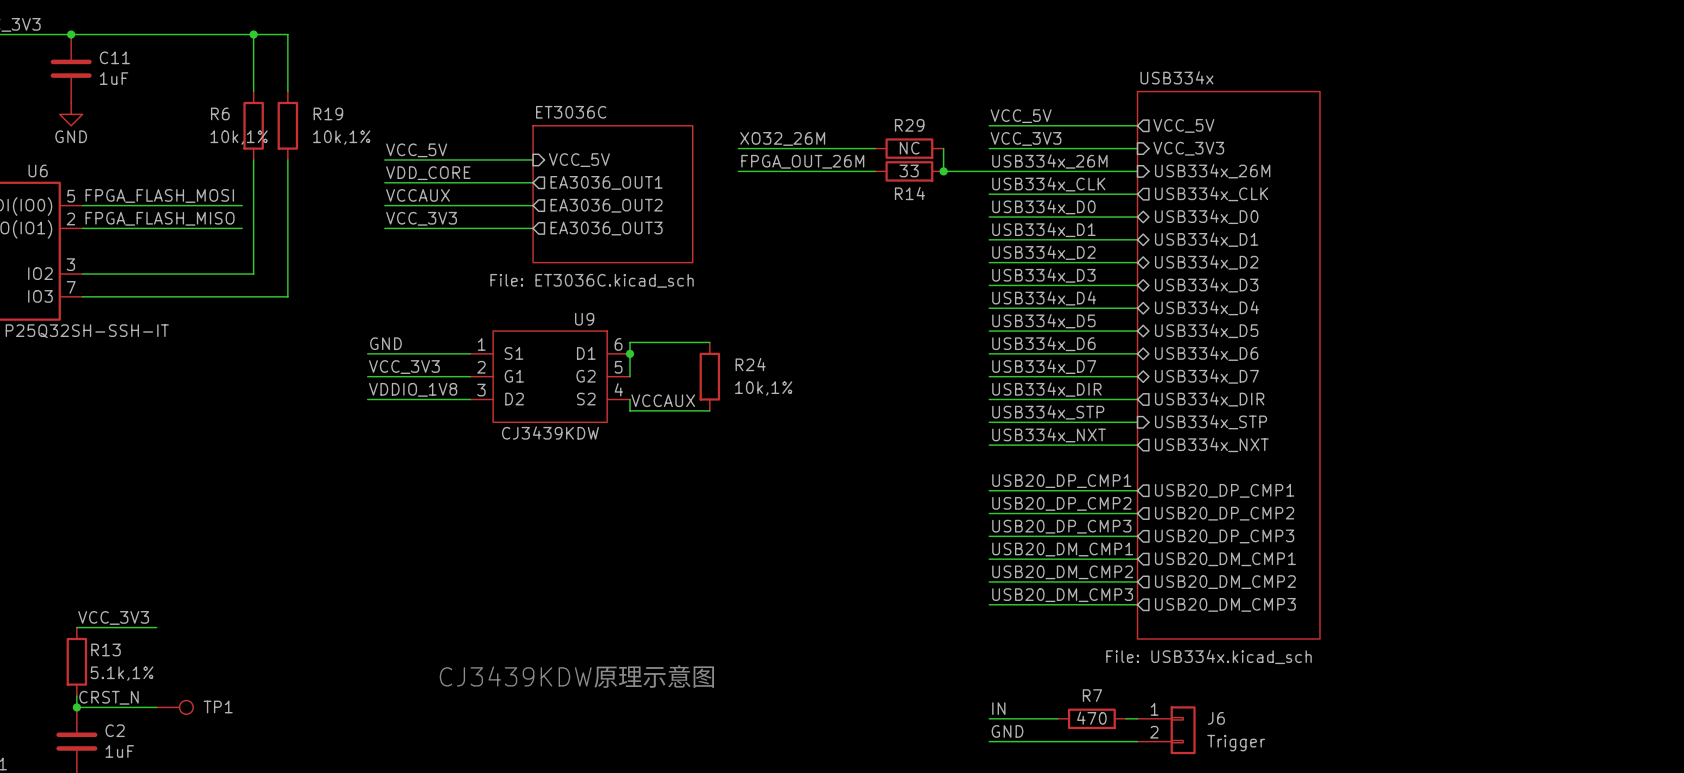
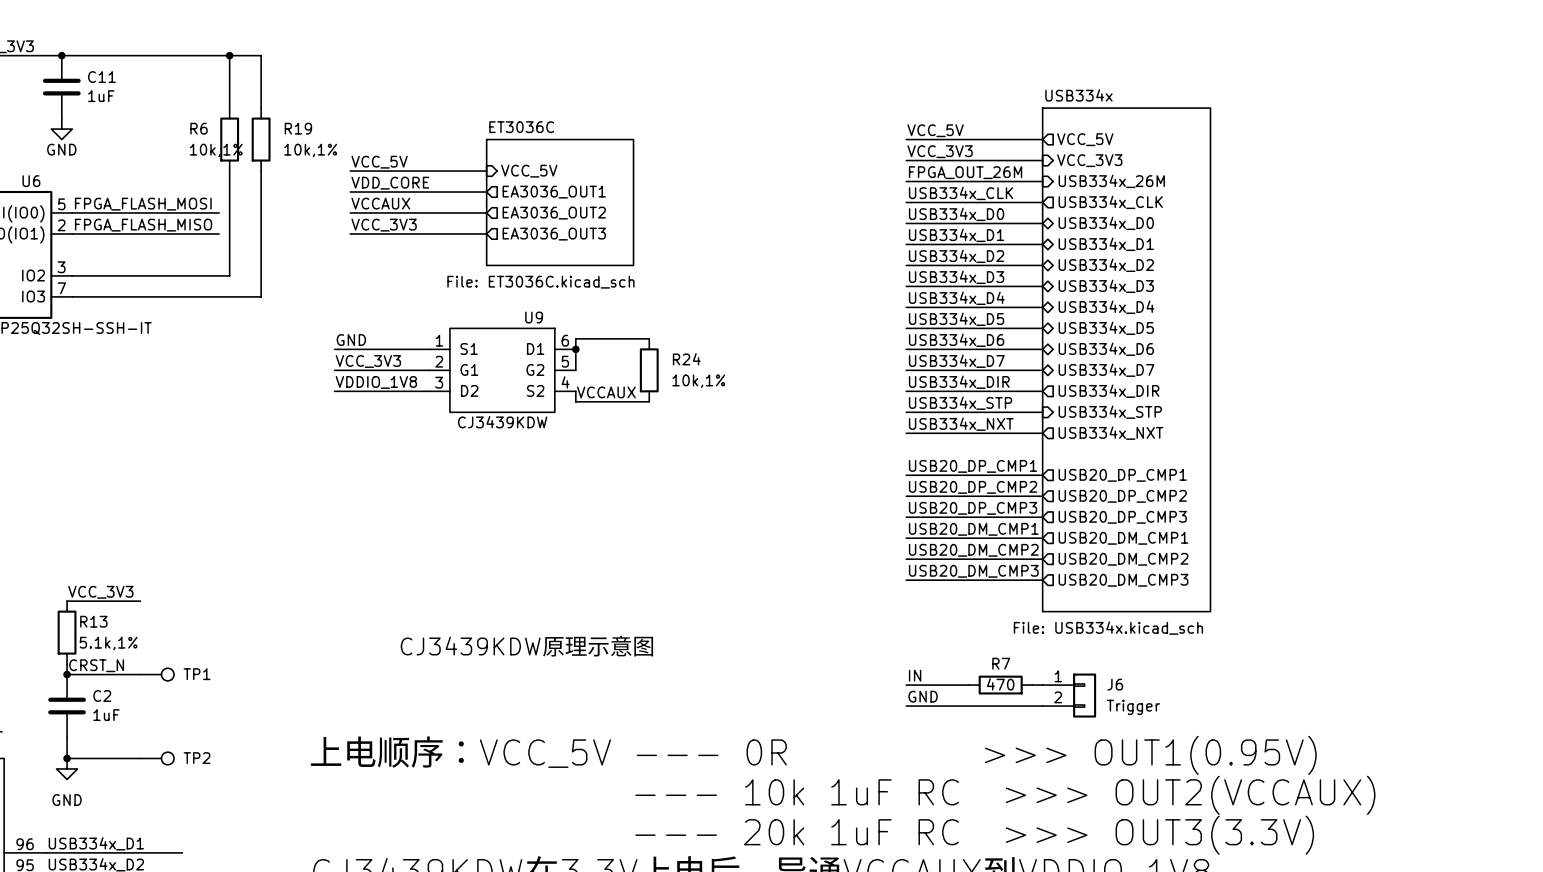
label: XO32_26M (782, 138) -> none
wire: (738, 148) (875, 148) -> none
R29: NC (909, 148) -> none
wire: (943, 148) (943, 171) (989, 171) -> none
label: FPGA_OUT_26M (802, 161) -> none
label: USB334x_26M (1049, 161) -> FPGA_OUT_26M (965, 172)
wire: (738, 171) (875, 171) -> none
R14: 33 (909, 171) -> none
junction: (943, 171) -> none

